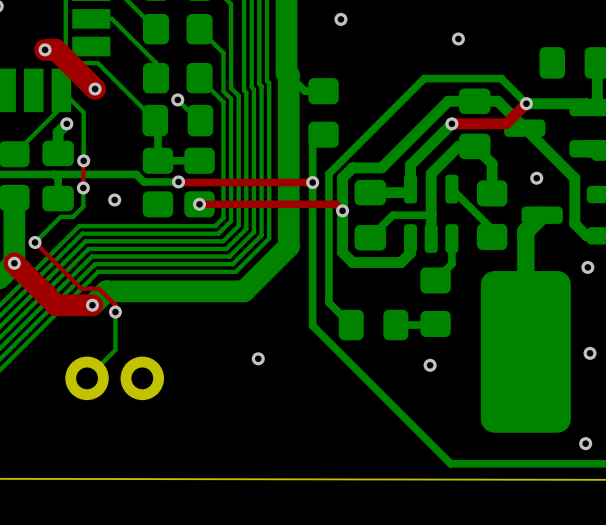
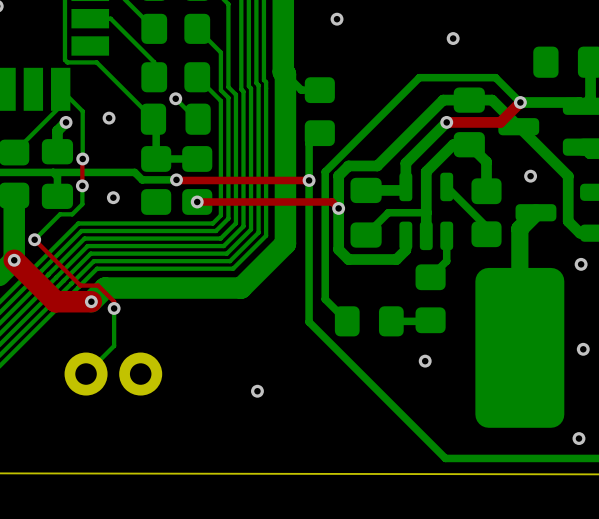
top track: (45, 49) (55, 49) (95, 89) -> none
via: (45, 49) -> none
via position: (95, 89) -> (109, 118)
via position: (258, 358) -> (257, 391)

